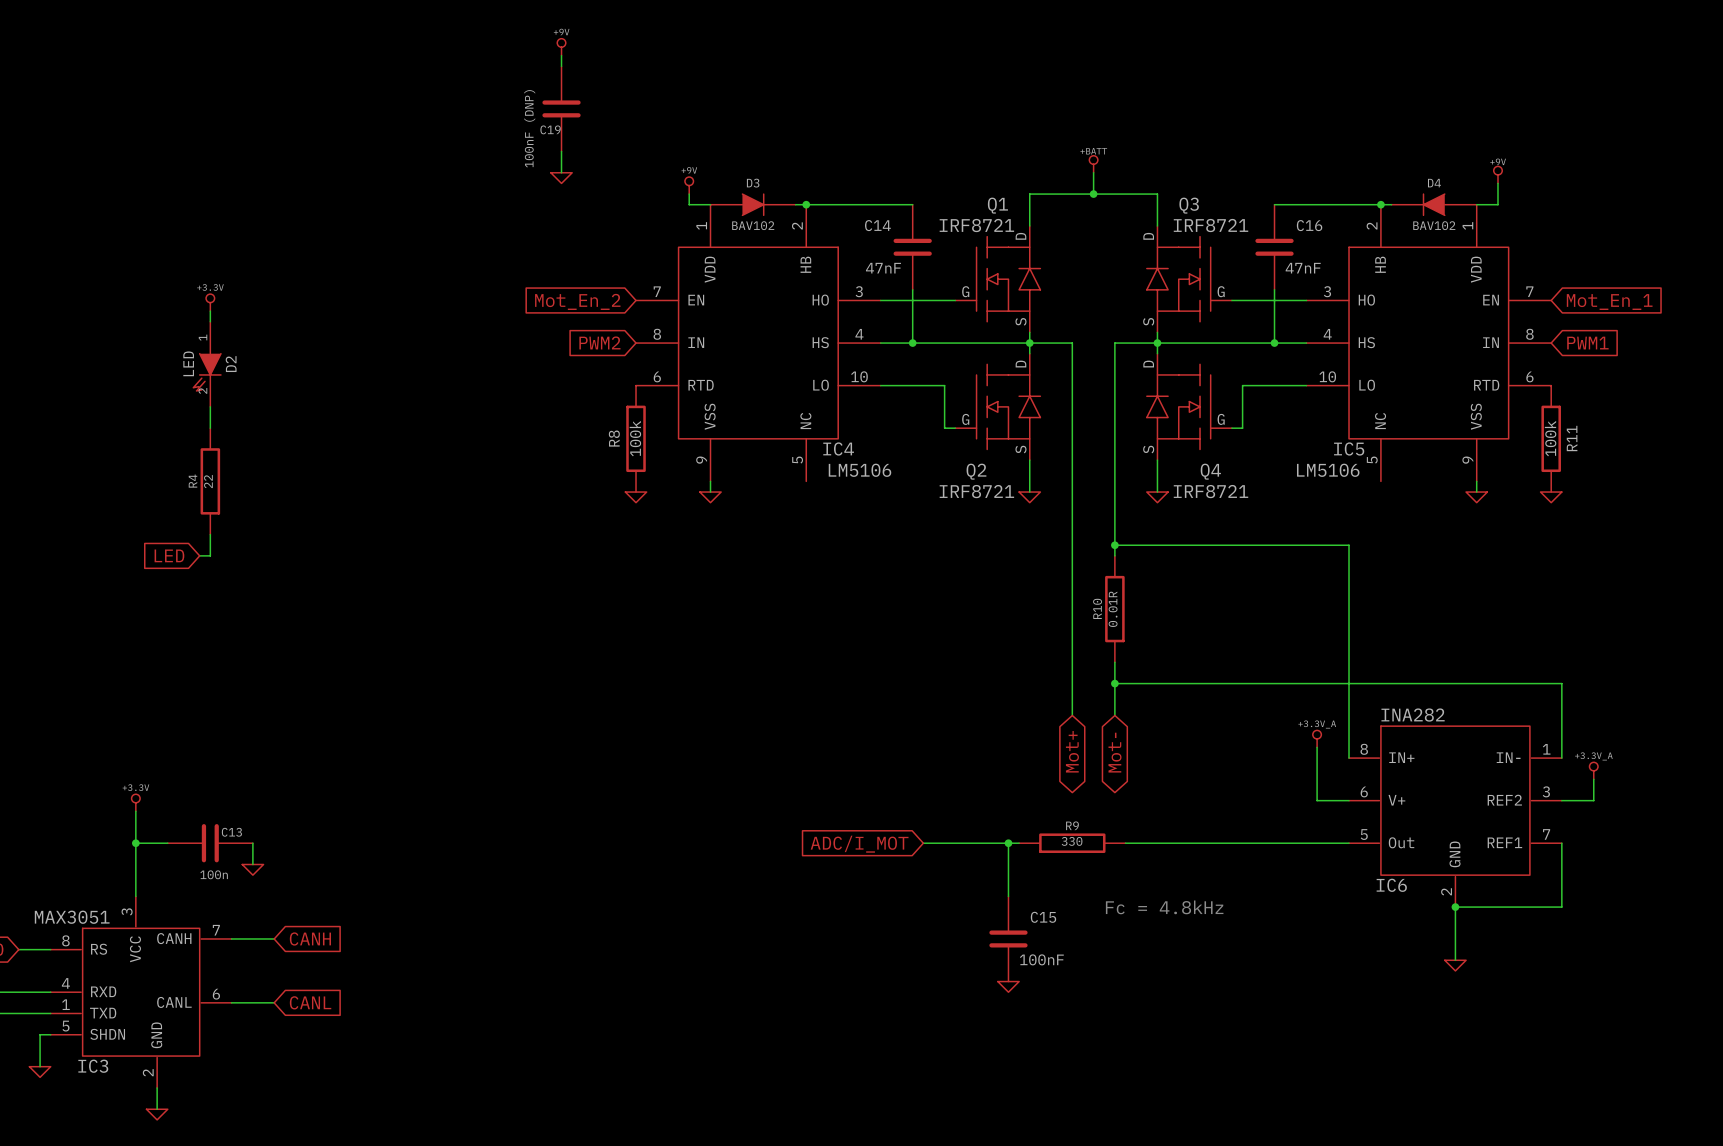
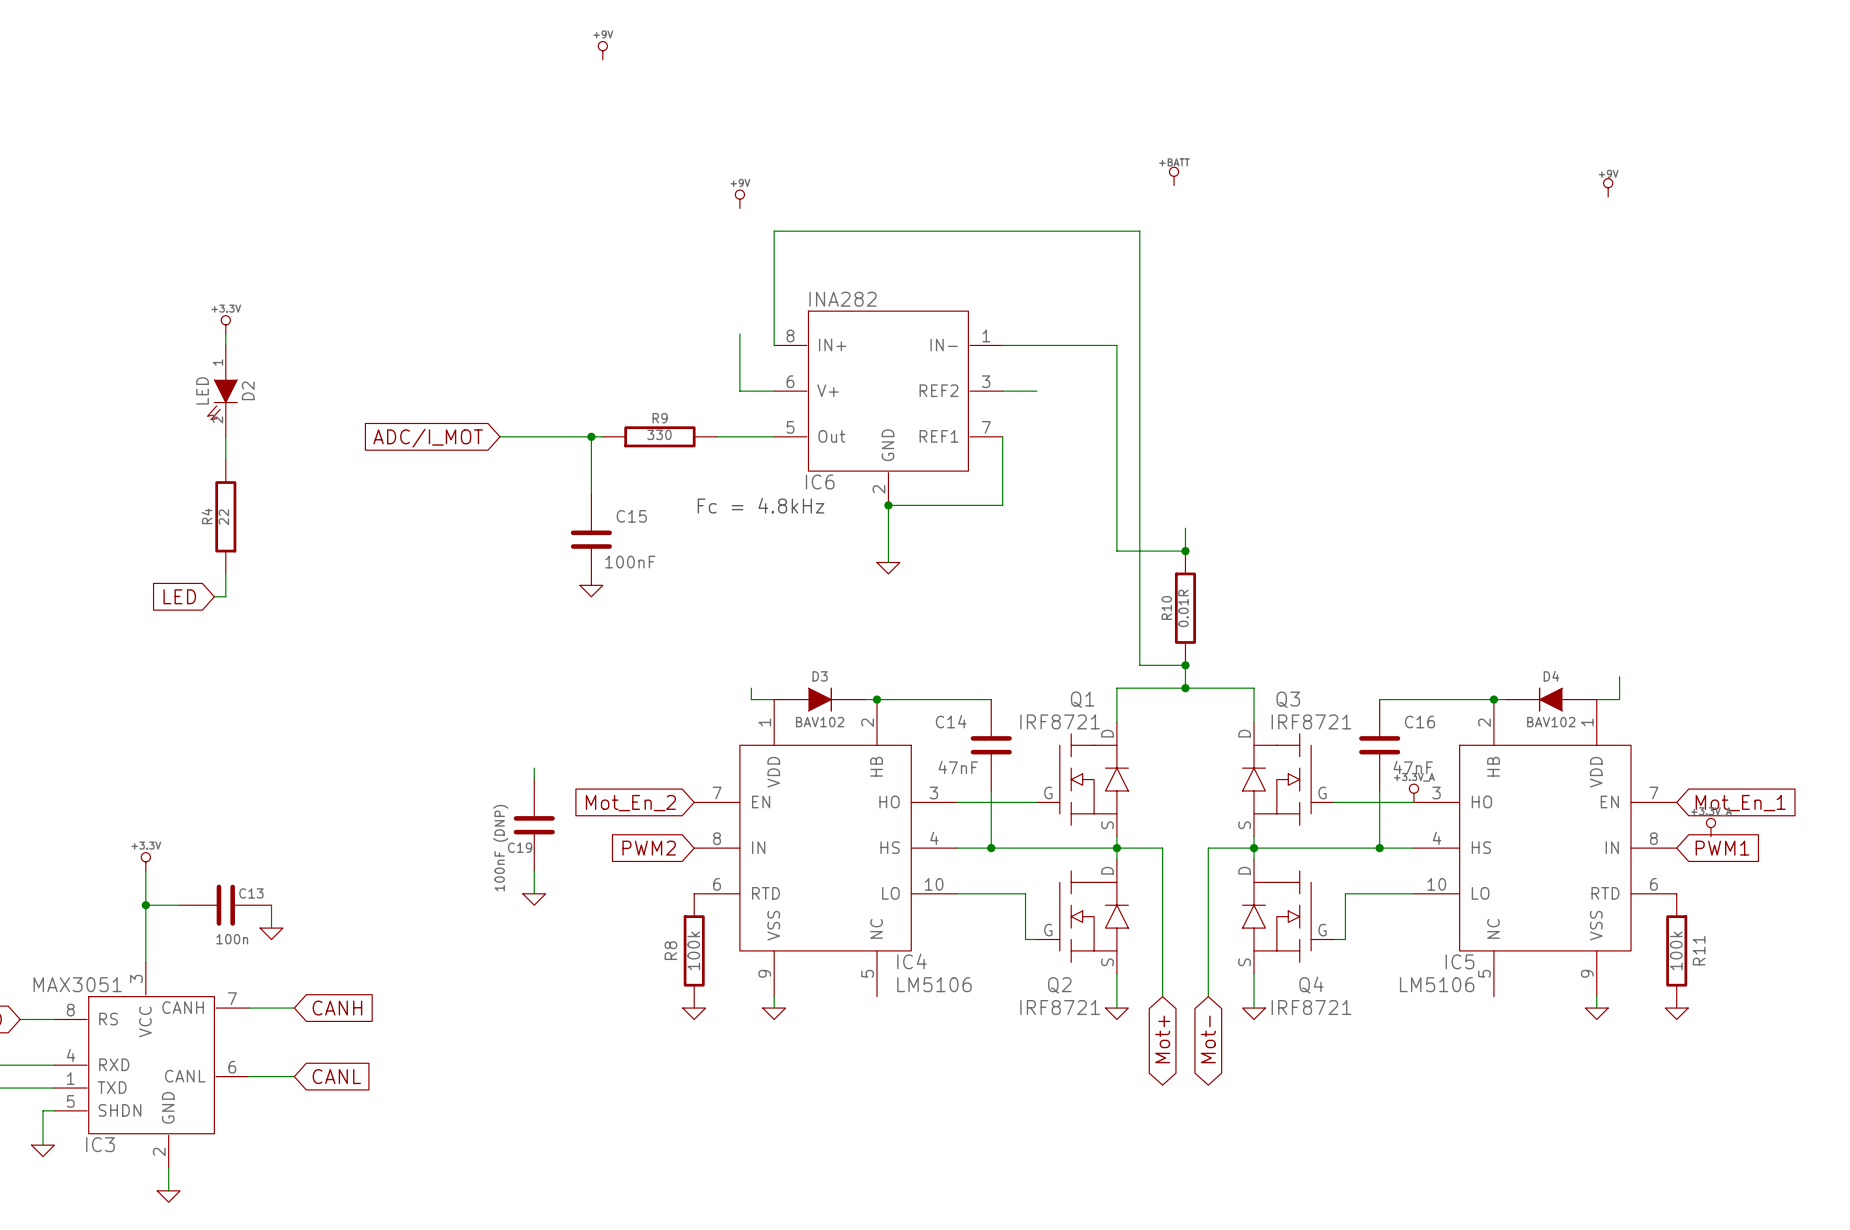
wire: (561, 55) (561, 66) -> none
C19 position: (561, 108) -> (534, 825)
wire: (561, 151) (561, 172) -> none
wire: (1093, 172) (1093, 194) -> none
power symbol: (561, 178) -> none
wire: (1497, 183) (1497, 204) (1476, 204) -> none
wire: (689, 194) (689, 204) (710, 204) -> none
junction: (1093, 194) -> none
D3 position: (753, 204) -> (819, 699)
wire: (795, 204) (912, 204) -> none
junction: (806, 204) -> none
wire: (1274, 204) (1391, 204) -> none
junction: (1380, 204) -> none
D4 position: (1434, 204) -> (1551, 699)
wire: (1029, 225) (1029, 194) (1157, 194) (1157, 225) -> none
C14 position: (912, 247) -> (991, 745)
C16 position: (1274, 247) -> (1379, 745)
Q1 position: (997, 279) -> (1082, 779)
Q3 position: (1189, 279) -> (1288, 779)
wire: (912, 289) (912, 343) -> none
wire: (1274, 289) (1274, 343) -> none
wire: (880, 300) (955, 300) -> none
wire: (1231, 300) (1306, 300) -> none
global label: Mot_En_2 (577, 301) -> none
global label: Mot_En_1 (1609, 302) -> none
wire: none -> (739, 334) (739, 391) (774, 391)
wire: none -> (774, 345) (774, 231) (1139, 231) (1139, 665) (1185, 665) (1185, 688)
wire: none -> (1002, 345) (1116, 345) (1116, 551) (1185, 551) (1185, 528)
wire: (1029, 332) (1029, 353) -> none
wire: (1157, 332) (1157, 353) -> none
global label: PWM2 (599, 342) -> none
IC4 position: (758, 343) -> (825, 848)
wire: (880, 343) (1072, 343) (1072, 715) -> none
junction: (912, 343) -> none
junction: (1029, 343) -> none
junction: (1157, 343) -> none
junction: (1274, 343) -> none
wire: (1306, 343) (1114, 343) (1114, 555) -> none
IC5 position: (1428, 343) -> (1545, 848)
global label: PWM1 (1587, 343) -> none
wire: none -> (1002, 391) (1036, 391)
wire: (880, 385) (944, 385) (944, 428) (955, 428) -> none
wire: (1306, 385) (1242, 385) (1242, 428) (1231, 428) -> none
wire: none -> (499, 436) (602, 436)
wire: none -> (591, 436) (591, 493)
junction: none -> (591, 436)
wire: none -> (717, 436) (774, 436)
wire: none -> (1002, 436) (1002, 505) (888, 505) (888, 562)
Q2 position: (997, 406) -> (1082, 916)
Q4 position: (1189, 406) -> (1288, 916)
global label: none -> ADC/I_MOT (428, 438)
R8 position: (636, 438) -> (694, 950)
R11 position: (1551, 438) -> (1676, 950)
wire: (1029, 460) (1029, 492) -> none
wire: (1157, 460) (1157, 492) -> none
junction: none -> (888, 505)
text: none -> Fc = 4.8kHz (761, 505)
wire: (710, 481) (710, 492) -> none
wire: (1476, 481) (1476, 492) -> none
power symbol: (636, 497) -> none
power symbol: (710, 497) -> none
power symbol: (1029, 497) -> none
power symbol: (1157, 497) -> none
power symbol: (1476, 497) -> none
power symbol: (1551, 497) -> none
power symbol: none -> (888, 568)
wire: (1114, 545) (1349, 545) (1349, 758) -> none
junction position: (1114, 545) -> (1185, 551)
power symbol: none -> (591, 591)
R10 position: (1114, 609) -> (1185, 608)
junction: none -> (1185, 665)
wire: none -> (1619, 676) (1619, 699) (1596, 699)
wire: none -> (751, 688) (751, 699) (774, 699)
junction: none -> (1185, 688)
wire: none -> (865, 699) (991, 699)
junction: none -> (877, 699)
wire: none -> (1379, 699) (1505, 699)
junction: none -> (1493, 699)
wire: (1114, 662) (1114, 715) -> (1379, 790) (1379, 848)
wire: none -> (1116, 722) (1116, 688) (1254, 688) (1254, 722)
wire: (1114, 683) (1561, 683) (1561, 758) -> none
junction: (1114, 683) -> none
wire: none -> (534, 768) (534, 779)
wire: none -> (956, 802) (1036, 802)
wire: (1317, 747) (1317, 800) (1349, 800) -> (1413, 802) (1333, 802)
global label: none -> Mot_En_2 (630, 803)
global label: none -> Mot_En_1 (1740, 803)
global label: Mot+ (1072, 751) -> none
global label: Mot- (1114, 752) -> none
wire: none -> (1116, 836) (1116, 859)
wire: none -> (1254, 836) (1254, 859)
wire: (1593, 779) (1593, 800) (1561, 800) -> none
global label: none -> PWM2 (649, 848)
wire: none -> (956, 848) (1162, 848) (1162, 996)
junction: none -> (991, 848)
junction: none -> (1116, 848)
junction: none -> (1254, 848)
junction: none -> (1379, 848)
wire: none -> (1413, 848) (1208, 848) (1208, 996)
global label: none -> PWM1 (1722, 848)
wire: none -> (534, 870) (534, 893)
IC6 position: (1455, 816) -> (888, 408)
wire: none -> (956, 893) (1025, 893) (1025, 939) (1036, 939)
wire: none -> (1413, 893) (1345, 893) (1345, 939) (1333, 939)
power symbol: none -> (534, 899)
wire: (923, 843) (1019, 843) -> none
wire: (1008, 843) (1008, 896) -> (991, 790) (991, 848)
junction: (1008, 843) -> none
R9 position: (1072, 843) -> (659, 436)
wire: (1125, 843) (1349, 843) -> none
wire: (1561, 843) (1561, 907) (1455, 907) (1455, 960) -> none
global label: ADC/I_MOT (859, 844) -> none
wire: none -> (1116, 973) (1116, 1008)
text: Fc = 4.8kHz (1164, 907) -> none
wire: none -> (1254, 973) (1254, 1008)
junction: (1455, 907) -> none
wire: none -> (774, 996) (774, 1008)
wire: none -> (1596, 996) (1596, 1008)
C15 position: (1008, 938) -> (591, 539)
power symbol: none -> (694, 1013)
power symbol: none -> (774, 1013)
power symbol: none -> (1254, 1013)
power symbol: none -> (1676, 1013)
global label: none -> Mot+ (1162, 1039)
global label: none -> Mot- (1208, 1039)
power symbol position: (1455, 965) -> (1596, 1013)
power symbol position: (1008, 986) -> (1116, 1013)

